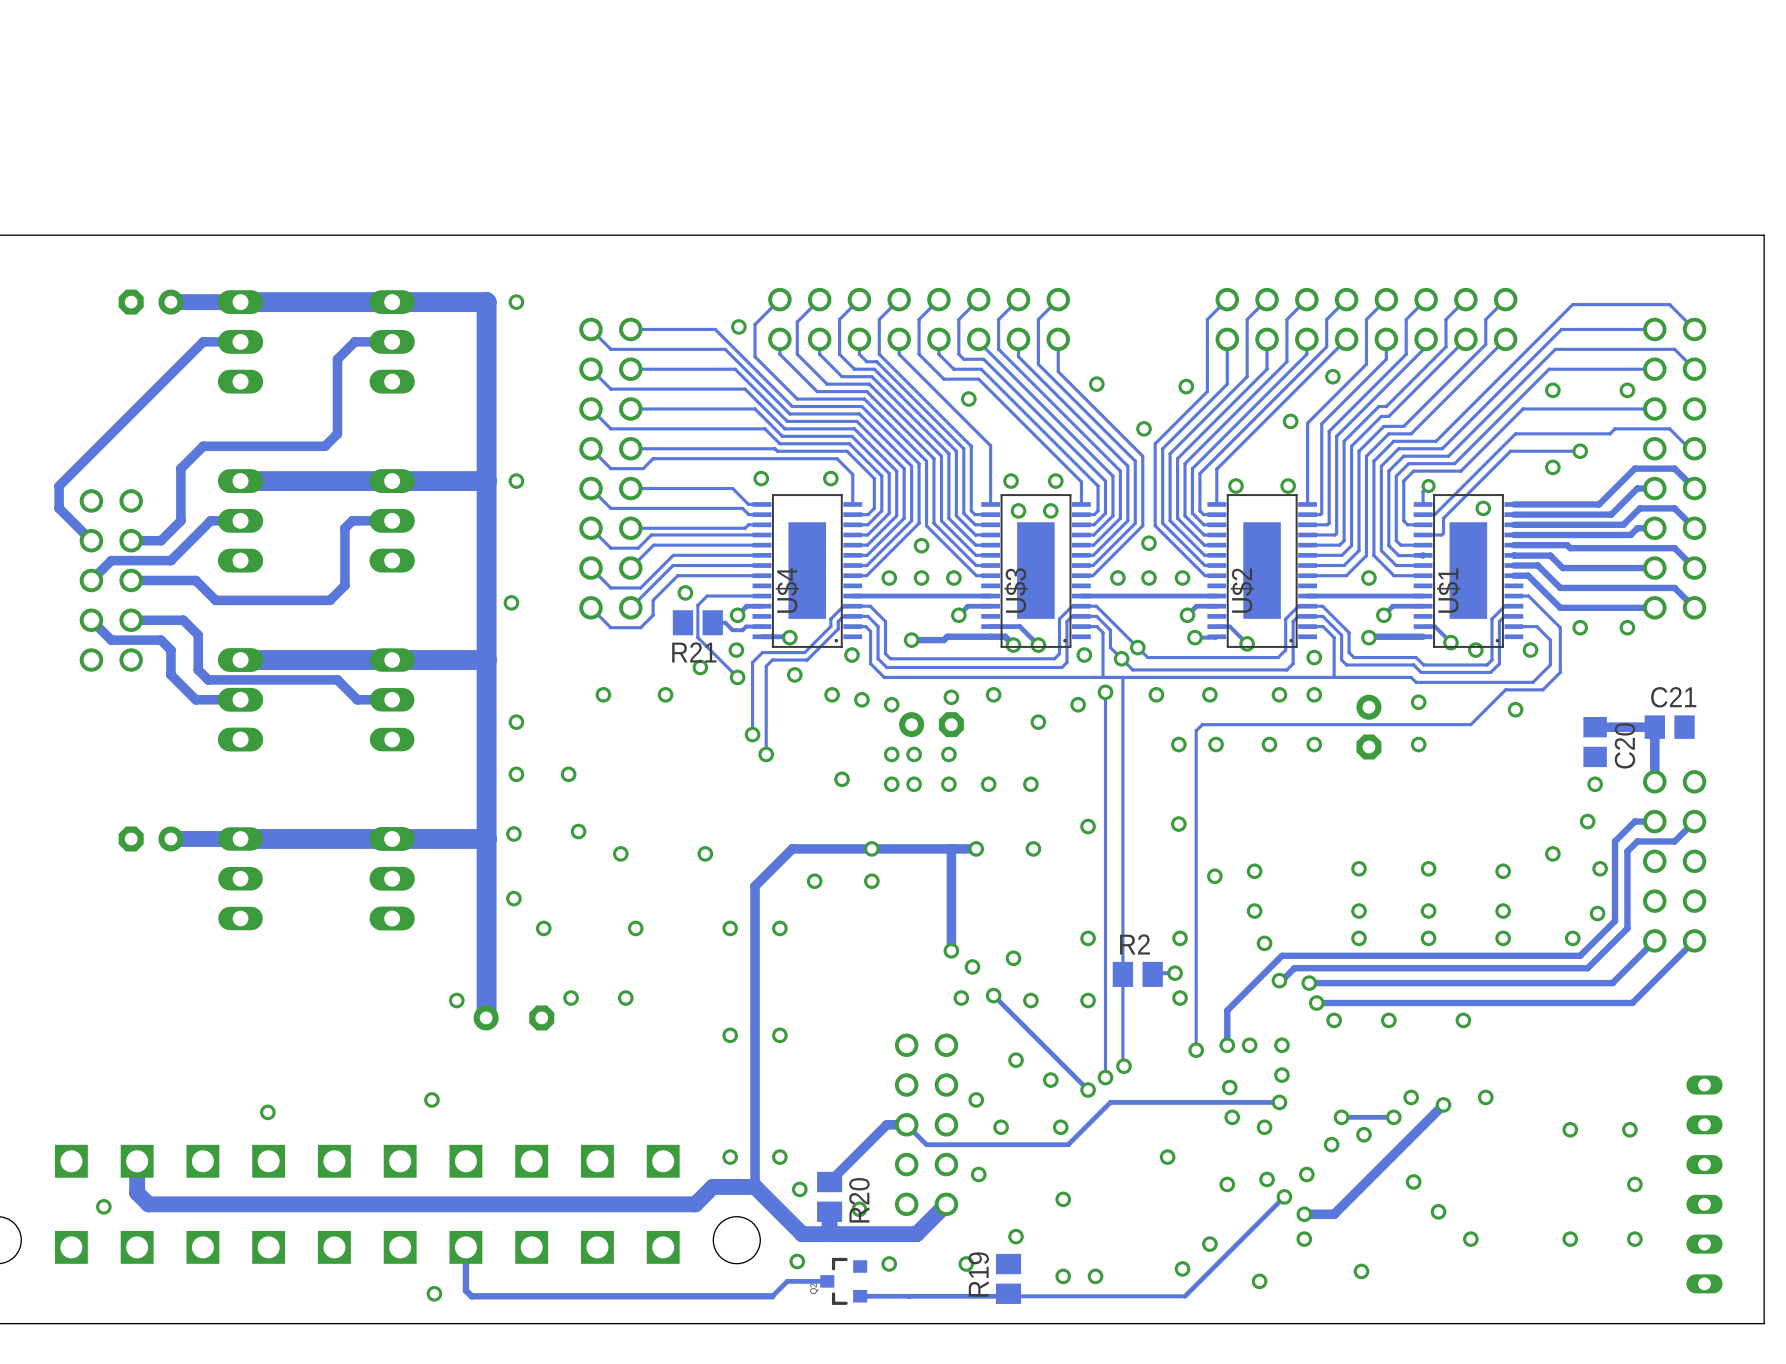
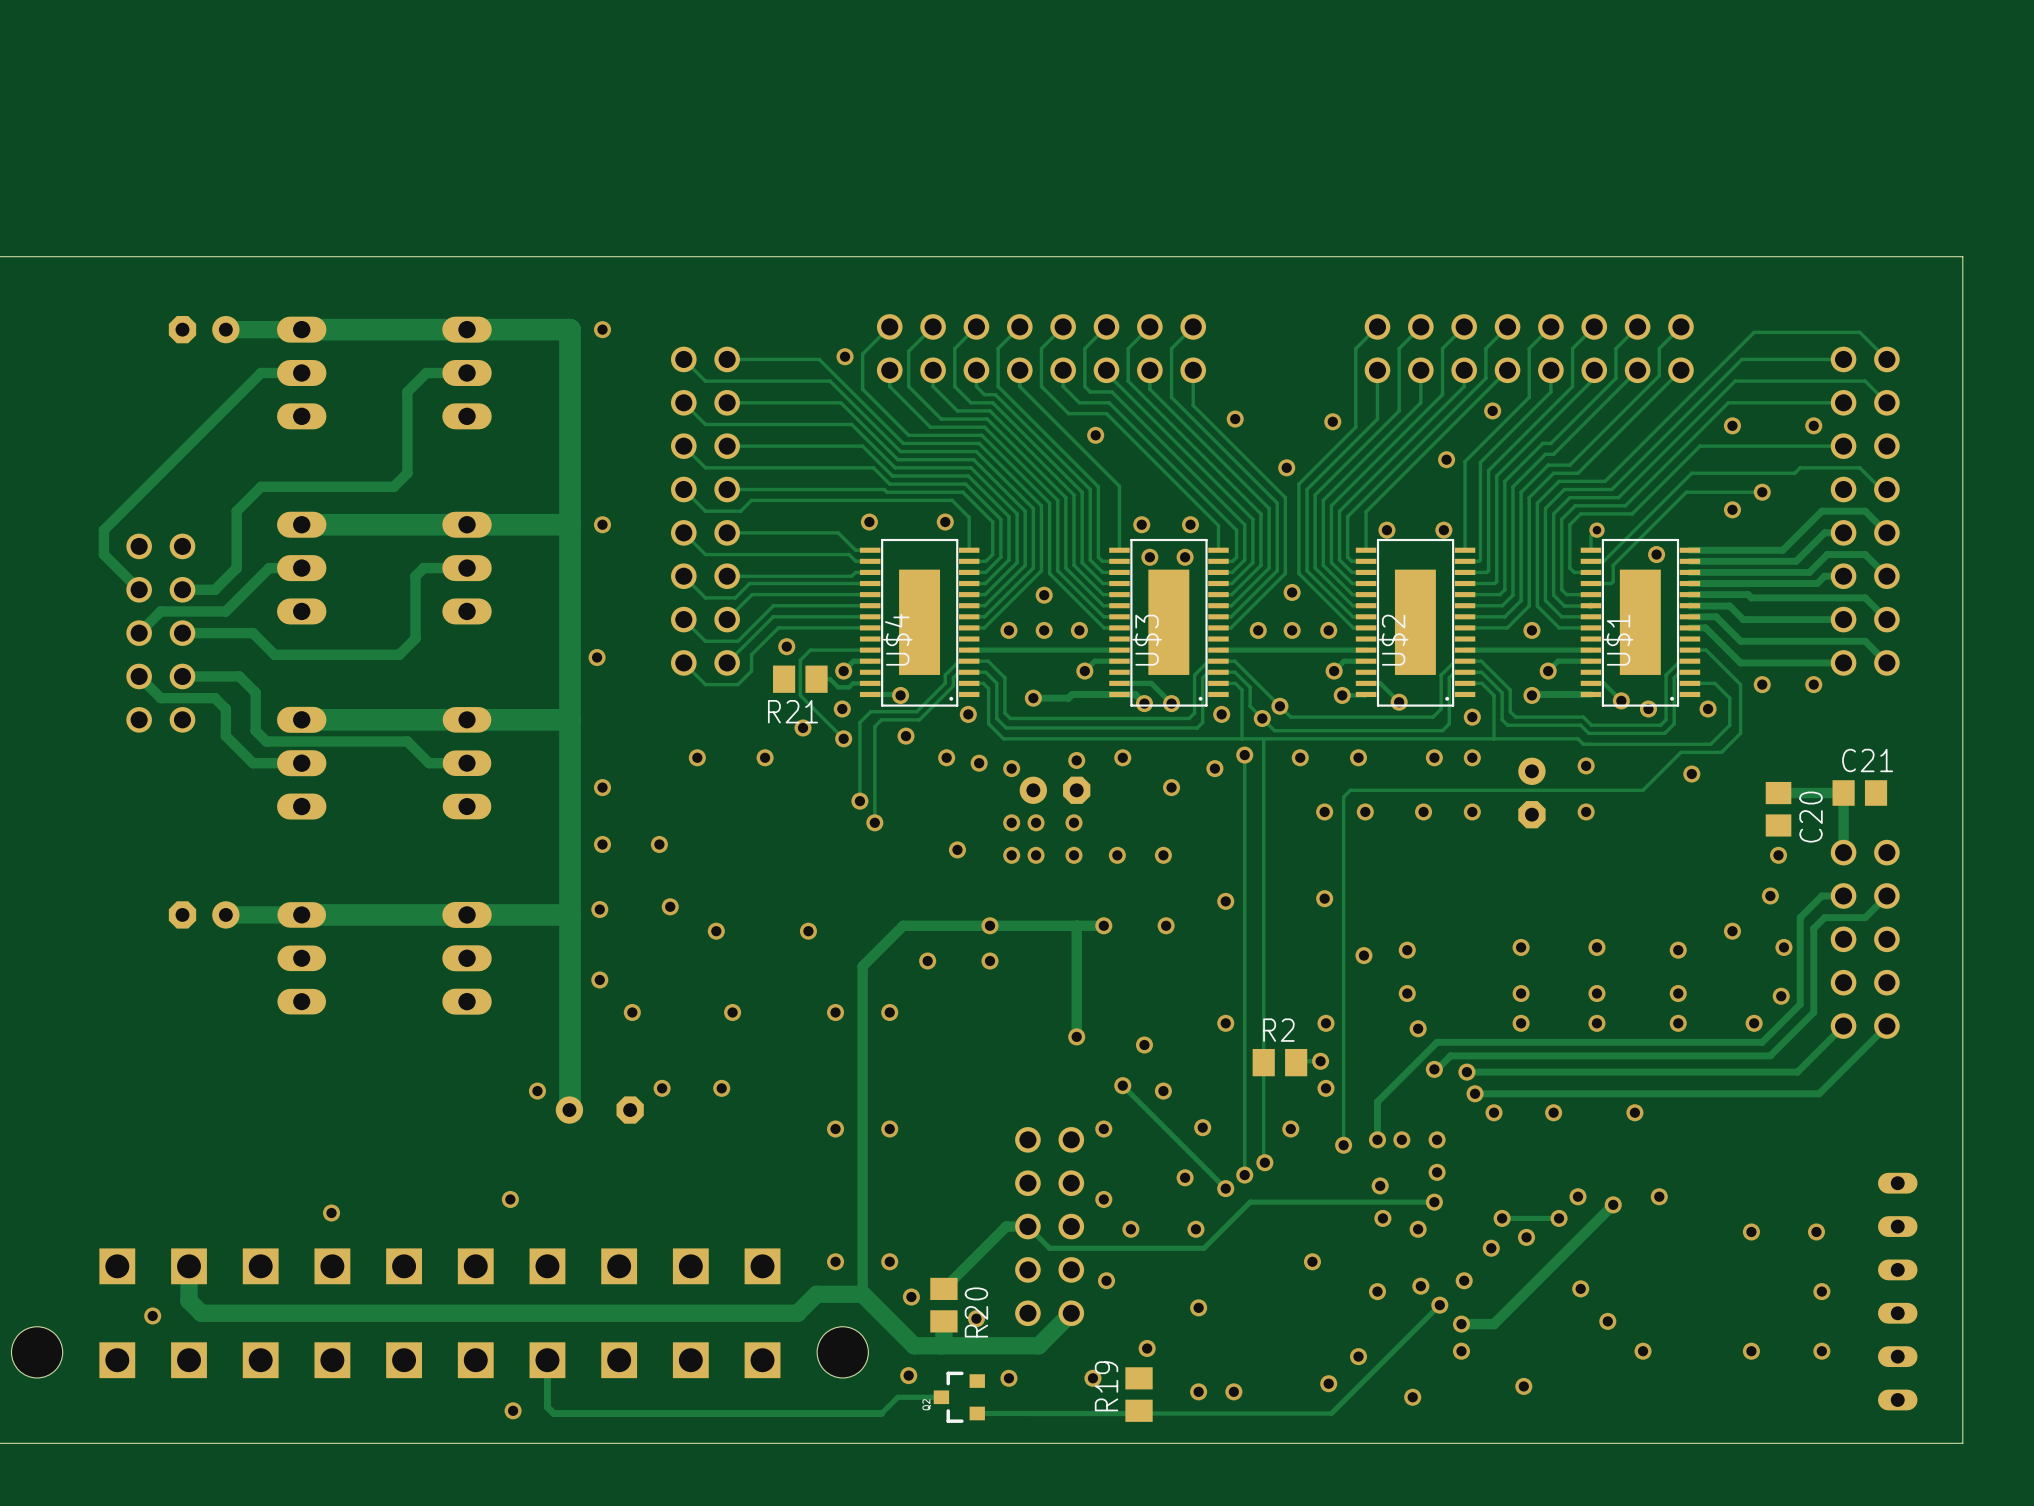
via: (972, 966) -> none
via: (961, 998) -> none
via: (1088, 1000) -> none
via: none -> (1202, 1127)
via: none -> (1103, 1129)
via: none -> (1290, 1129)
via: (1016, 1060) -> none

